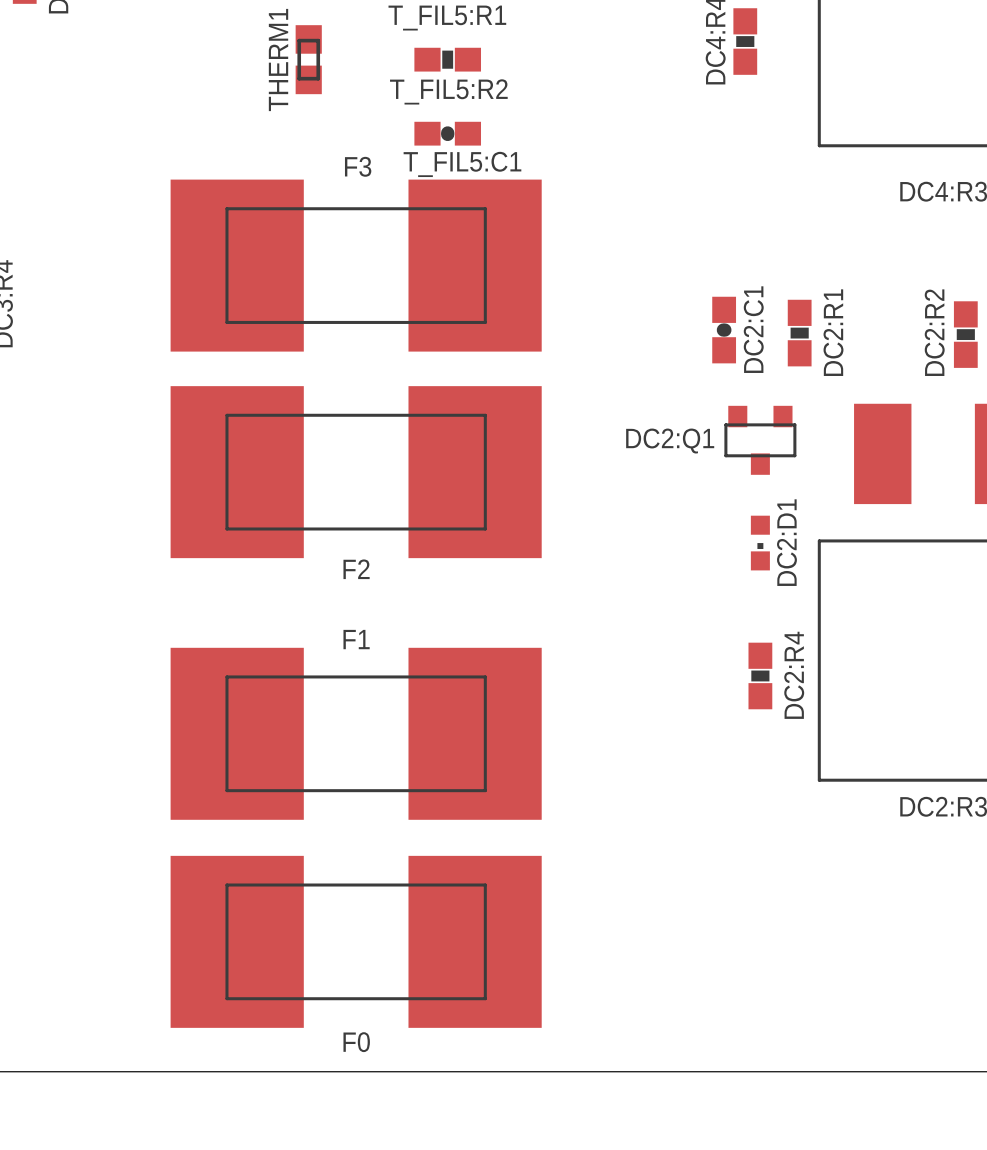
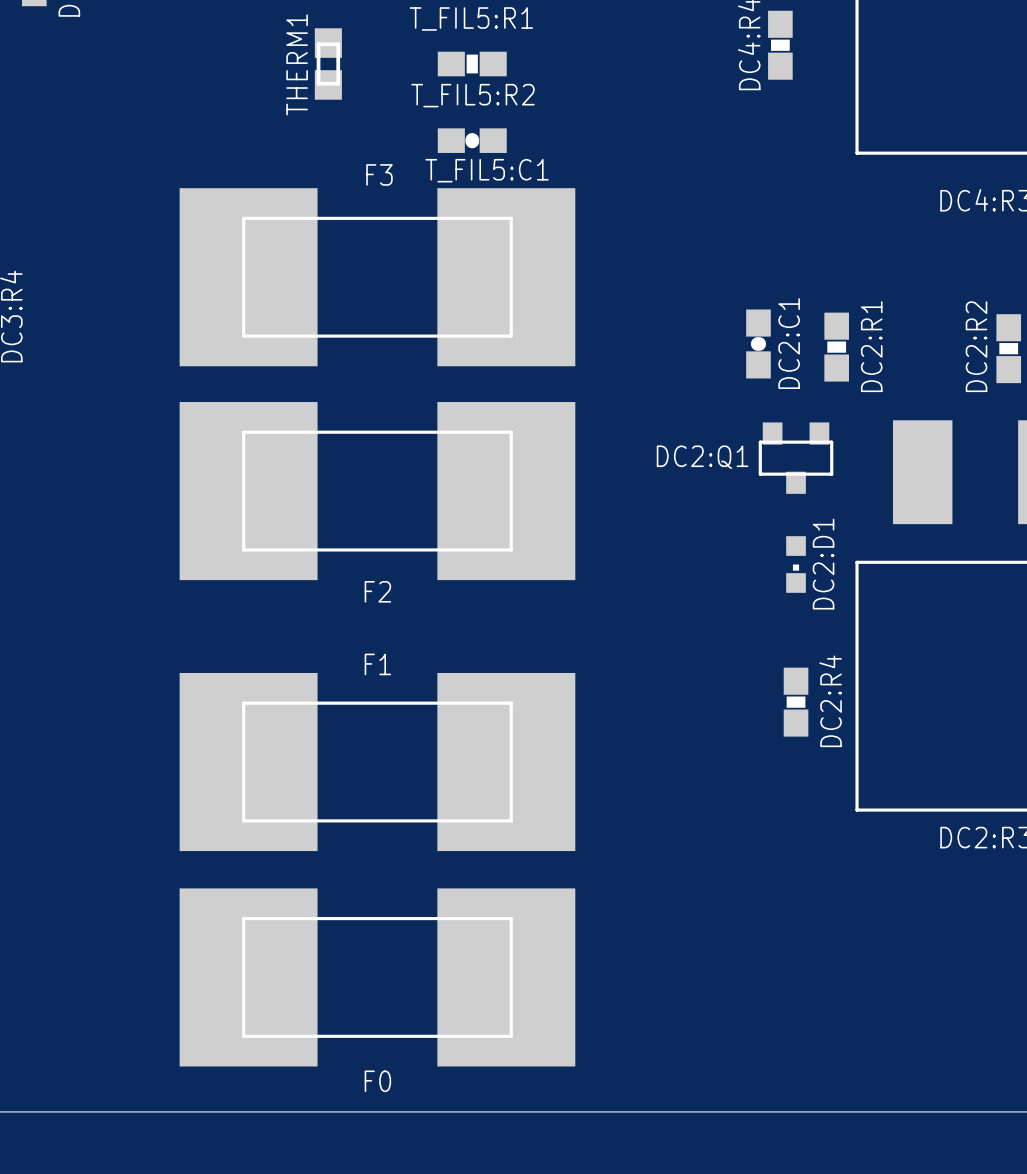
F3 footprint: [170, 179, 542, 352] -> [179, 188, 576, 367]
F2 footprint: [170, 386, 542, 559] -> [179, 402, 576, 581]
F1 footprint: [170, 647, 542, 820] -> [179, 672, 576, 852]
F0 footprint: [170, 855, 542, 1028] -> [179, 888, 576, 1067]

